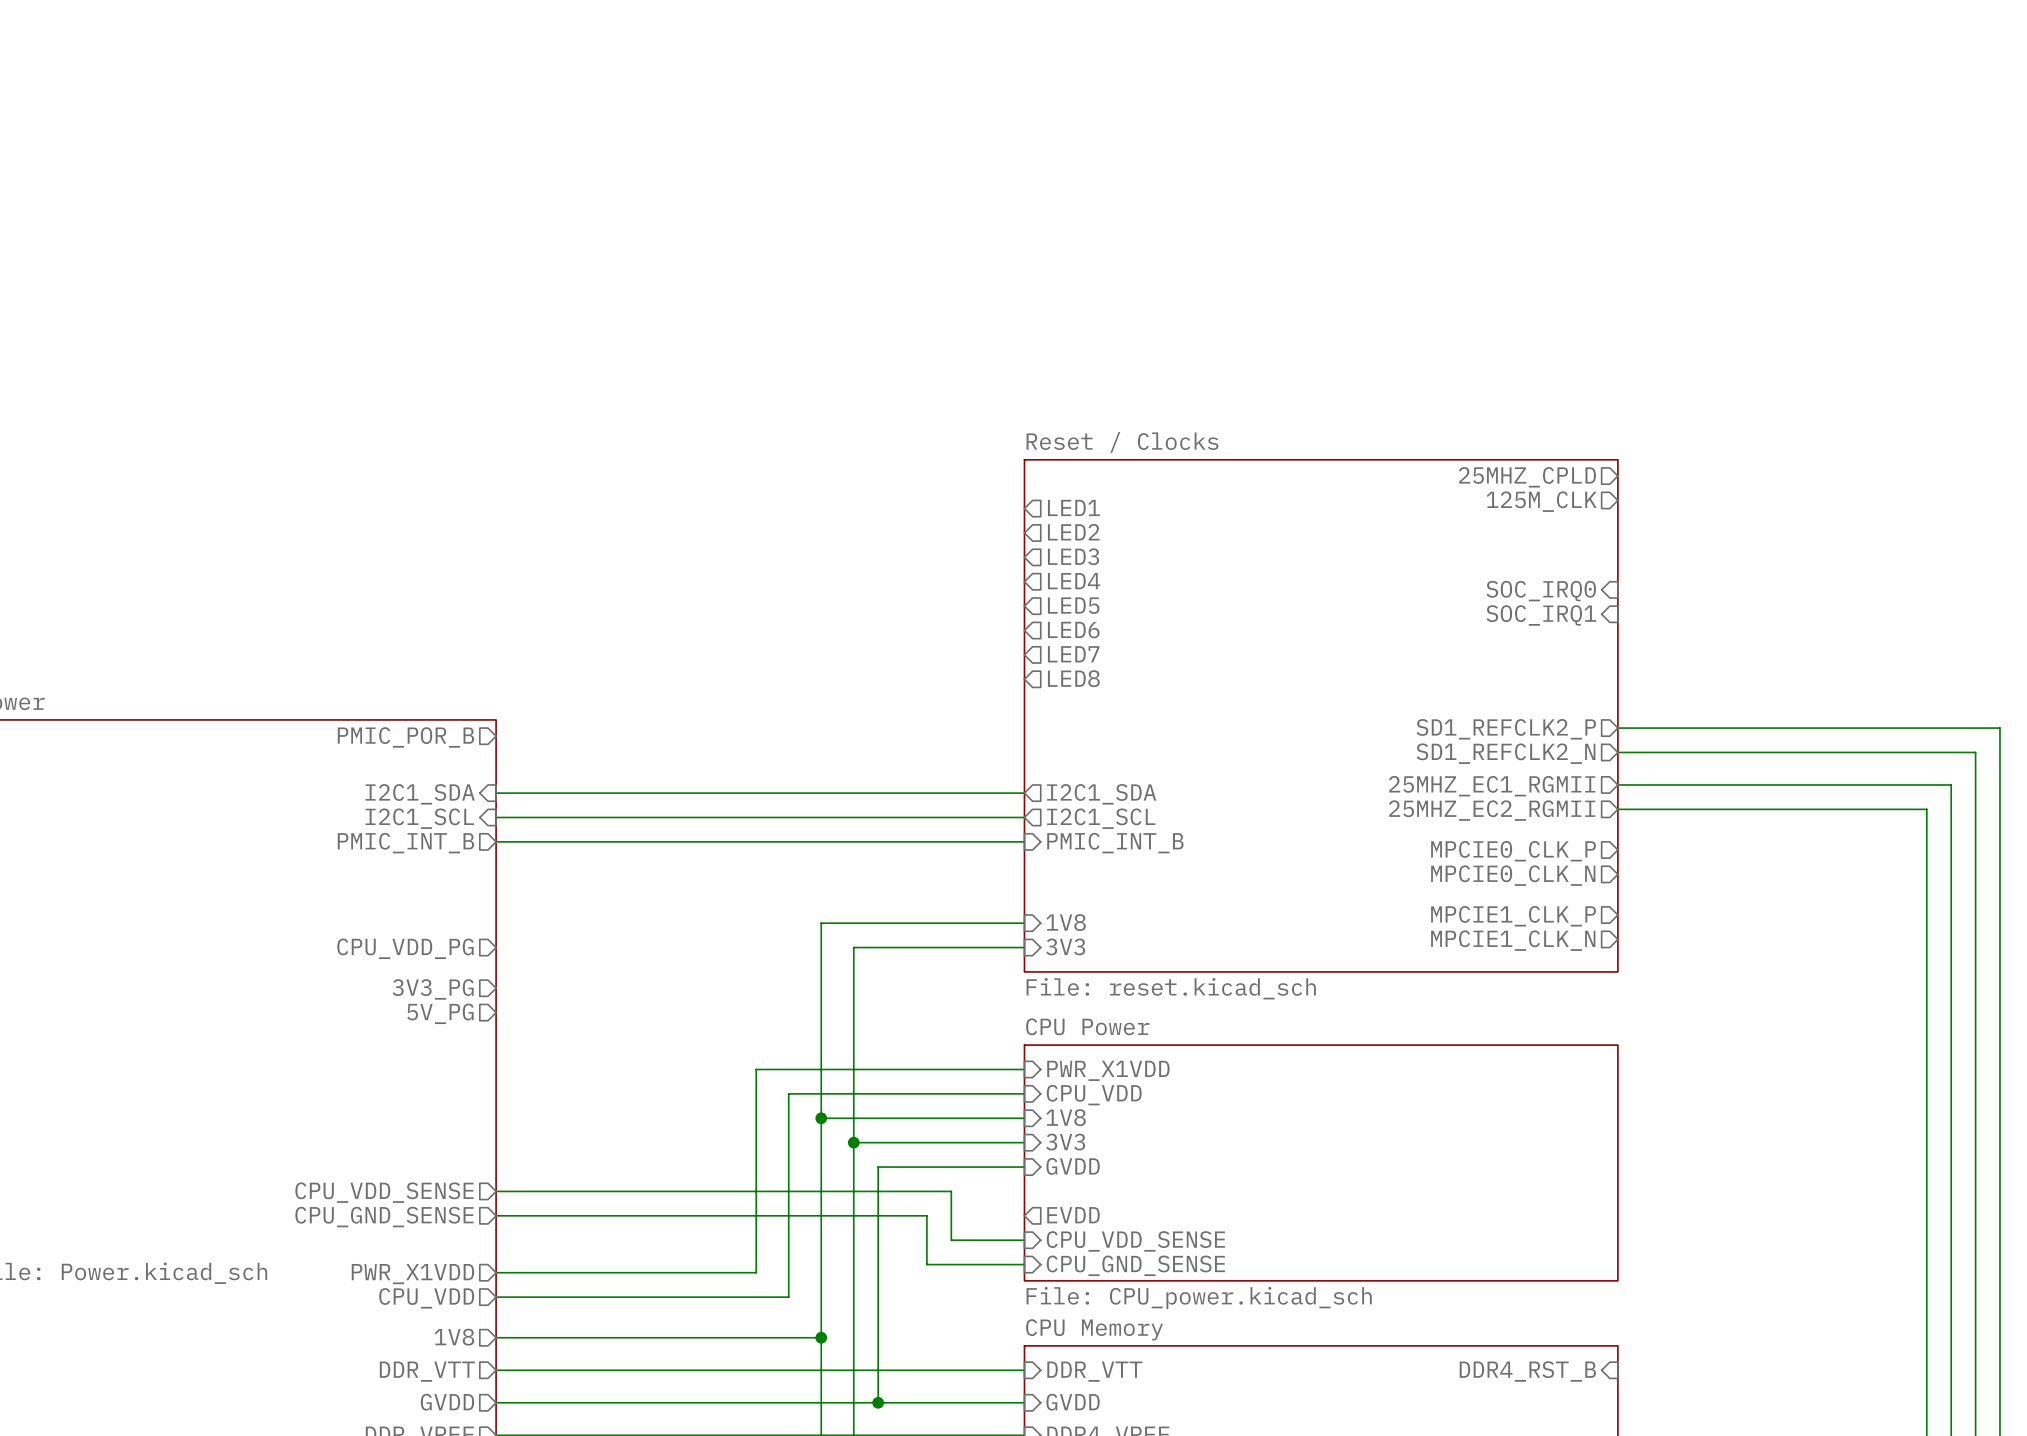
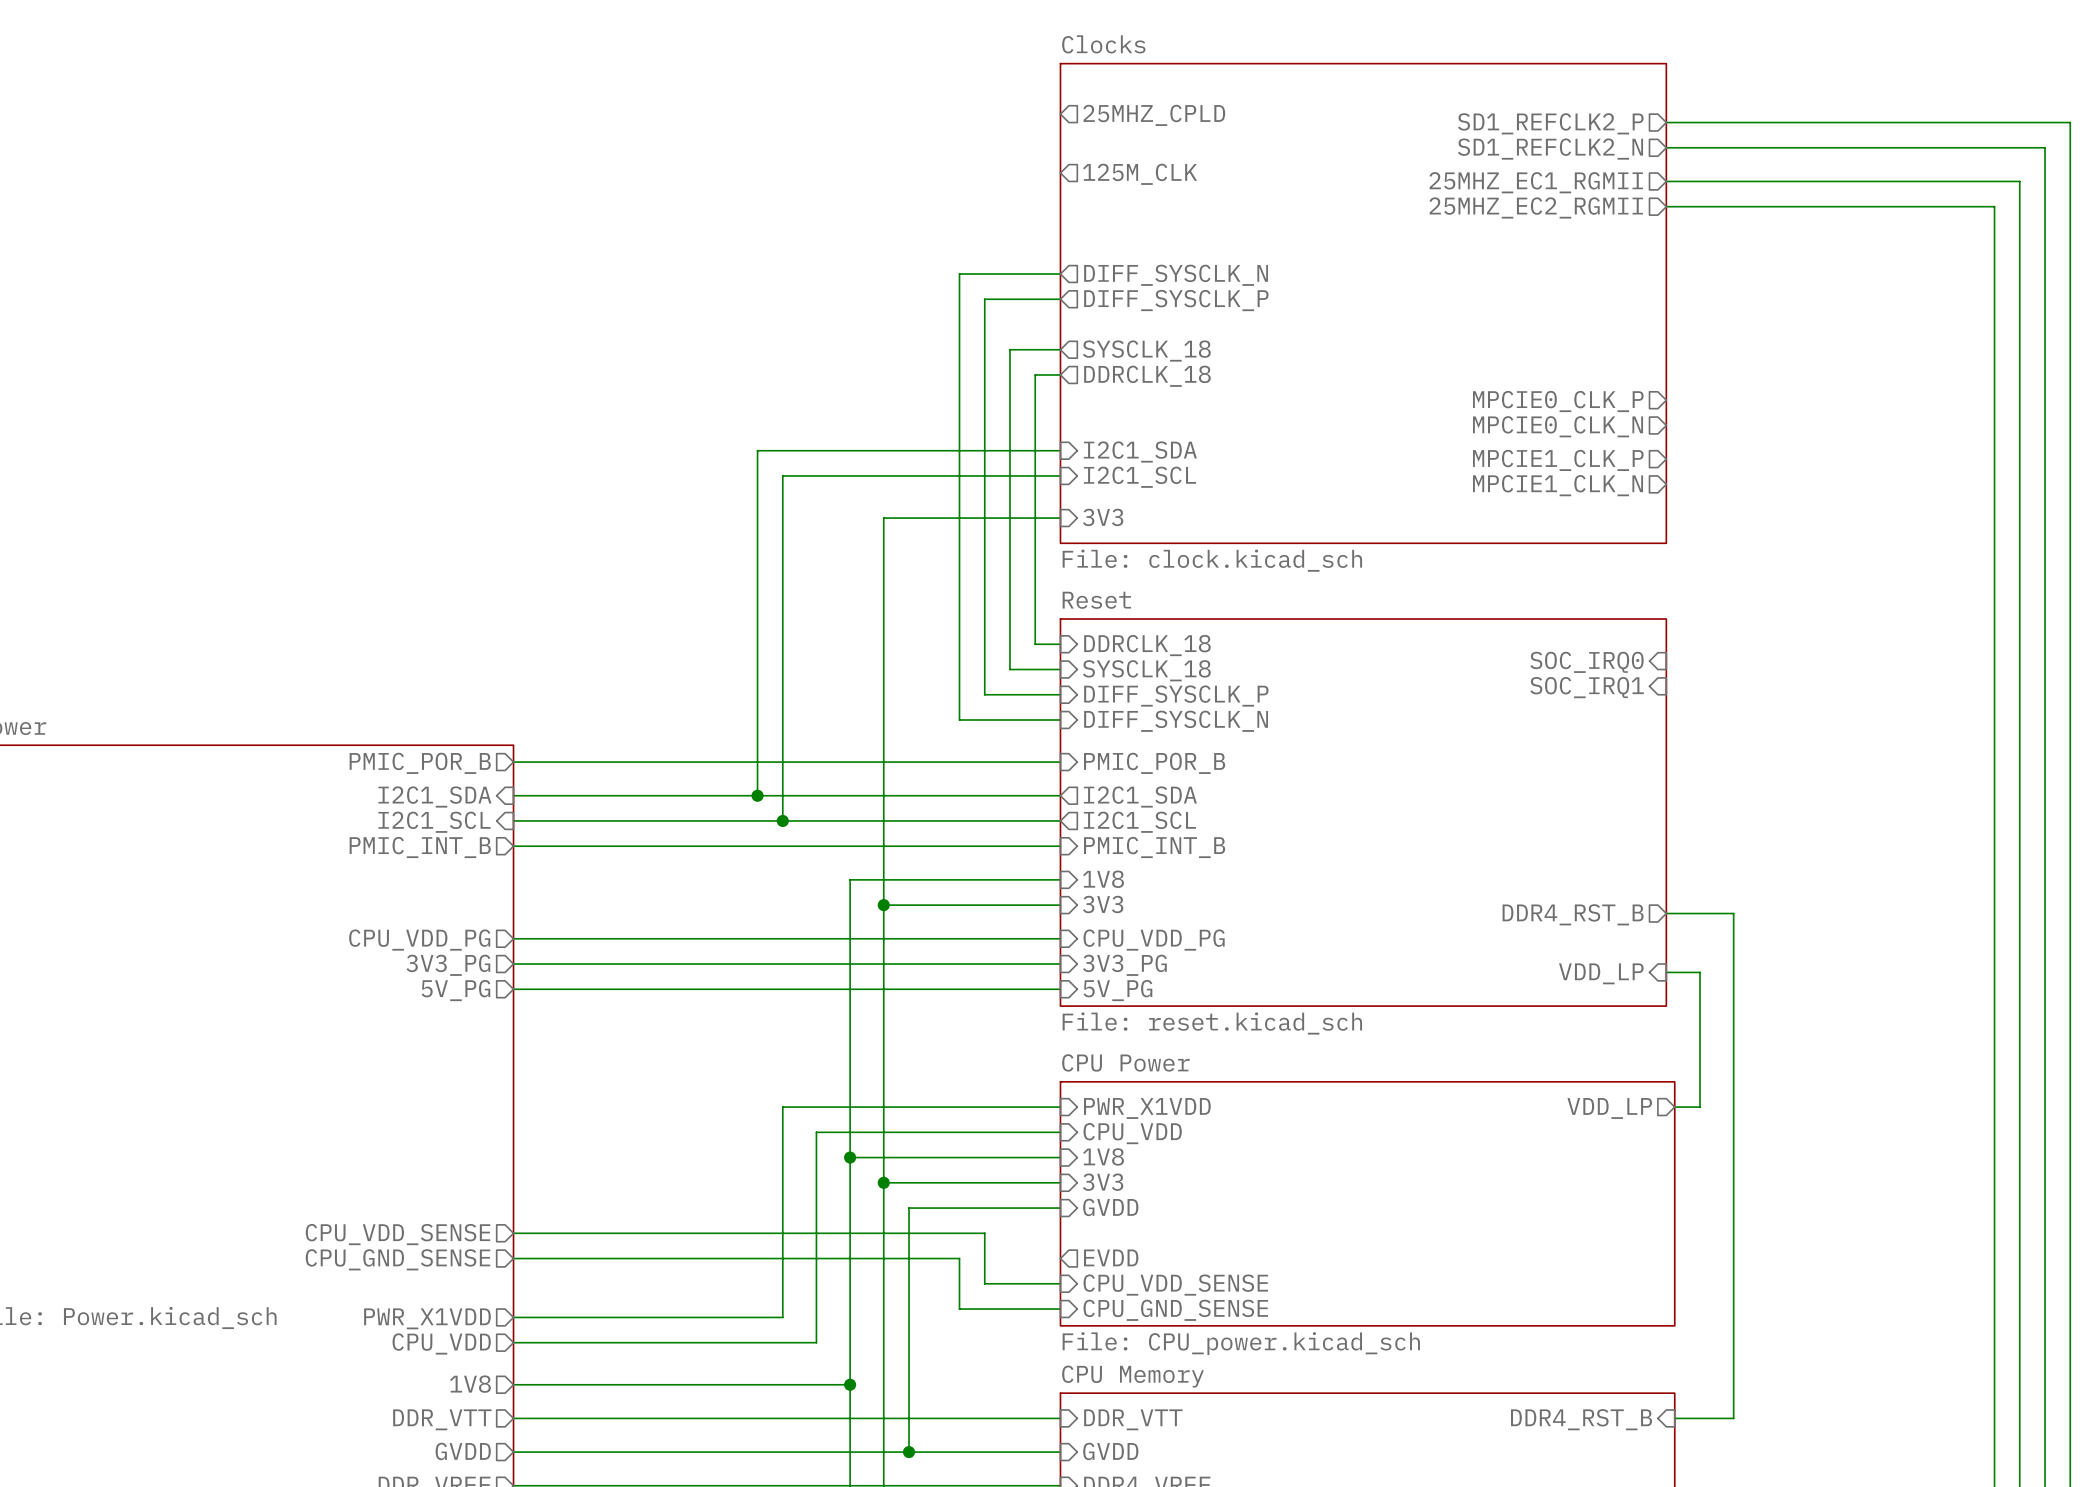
sheet pin: none -> 25MHZ_CPLD (1154, 115)
sheet pin: none -> SD1_REFCLK2_P (1550, 123)
sheet pin: none -> SD1_REFCLK2_N (1550, 149)
sheet pin: none -> 125M_CLK (1140, 174)
sheet pin: none -> 25MHZ_EC1_RGMII (1536, 182)
sheet pin: none -> 25MHZ_EC2_RGMII (1536, 207)
wire: none -> (1060, 274) (959, 274) (959, 719) (1060, 719)
sheet pin: none -> DIFF_SYSCLK_N (1176, 275)
wire: none -> (1060, 299) (984, 299) (984, 694) (1060, 694)
sheet pin: none -> DIFF_SYSCLK_P (1176, 300)
sheet Clocks: none -> File: clock.kicad_sch (1363, 303)
wire: none -> (1060, 349) (1009, 349) (1009, 669) (1060, 669)
sheet pin: none -> SYSCLK_18 (1146, 351)
wire: none -> (1060, 374) (1035, 374) (1035, 644) (1060, 644)
sheet pin: none -> DDRCLK_18 (1147, 376)
sheet pin: none -> MPCIE0_CLK_P (1558, 401)
sheet pin: none -> MPCIE0_CLK_N (1558, 426)
wire: none -> (1060, 450) (757, 450) (757, 795)
sheet pin: none -> I2C1_SDA (1140, 451)
sheet pin: none -> MPCIE1_CLK_P (1558, 460)
wire: none -> (1060, 475) (782, 475) (782, 820)
sheet pin: none -> I2C1_SCL (1139, 477)
sheet pin: 25MHZ_CPLD (1527, 477) -> MPCIE1_CLK_N (1558, 485)
sheet pin: 125M_CLK (1541, 501) -> none
sheet pin shape: output (1073, 507) -> input (1103, 517)
sheet pin: LED1 (1073, 507) -> 3V3 (1103, 517)
sheet pin: LED2 (1073, 532) -> none
sheet pin: LED3 (1073, 556) -> none
sheet pin: LED4 (1074, 581) -> none
sheet pin position: SOC_IRQ0 (1541, 591) -> SOC_IRQ0 (1586, 662)
sheet pin: LED5 (1073, 605) -> none
sheet pin position: SOC_IRQ1 (1541, 615) -> SOC_IRQ1 (1587, 687)
sheet pin: none -> DDRCLK_18 (1147, 645)
sheet pin: LED6 (1073, 630) -> none
sheet pin: none -> SYSCLK_18 (1146, 670)
sheet pin: LED7 (1073, 654) -> none
sheet pin: none -> DIFF_SYSCLK_P (1176, 696)
sheet pin: LED8 (1073, 678) -> none
sheet pin: none -> DIFF_SYSCLK_N (1176, 721)
sheet Reset / Clocks: File: reset.kicad_sch (1321, 715) -> none
wire: (1617, 728) (1999, 728) -> (1666, 122) (2070, 122) (2070, 753)
sheet pin: SD1_REFCLK2_P (1506, 729) -> none
wire: none -> (513, 762) (1060, 762)
sheet pin: none -> PMIC_POR_B (1154, 763)
wire: (1617, 752) (1975, 752) -> (1666, 147) (2045, 147) (2045, 778)
sheet pin: SD1_REFCLK2_N (1506, 753) -> none
junction: none -> (757, 795)
sheet pin: none -> I2C1_SDA (434, 796)
sheet pin: none -> I2C1_SDA (1140, 796)
sheet Reset: none -> File: reset.kicad_sch (1363, 812)
wire: (1617, 784) (1951, 784) -> (1666, 181) (2019, 181) (2019, 812)
sheet pin: 25MHZ_EC1_RGMII (1492, 786) -> none
junction: none -> (782, 820)
sheet pin: I2C1_SDA (420, 794) -> I2C1_SCL (434, 822)
sheet pin: I2C1_SDA (1101, 794) -> I2C1_SCL (1139, 822)
wire: (1617, 809) (1926, 809) -> (1666, 206) (1994, 206) (1994, 837)
sheet pin: 25MHZ_EC2_RGMII (1492, 810) -> none
sheet pin shape: input (419, 818) -> output (420, 847)
sheet pin: I2C1_SCL (419, 818) -> PMIC_INT_B (420, 847)
sheet pin shape: output (1101, 818) -> input (1154, 847)
sheet pin: I2C1_SCL (1101, 818) -> PMIC_INT_B (1154, 847)
wire: (496, 841) (1024, 841) -> (513, 795) (1060, 795)
sheet pin: PMIC_INT_B (405, 843) -> none
sheet pin: PMIC_INT_B (1115, 843) -> none
sheet pin: MPCIE0_CLK_P (1513, 851) -> none
wire: none -> (883, 905) (1060, 905)
junction: none -> (883, 905)
sheet pin: MPCIE0_CLK_N (1513, 875) -> DDR4_RST_B (1573, 914)
wire: none -> (1666, 913) (1733, 913) (1733, 1418) (1674, 1418)
wire: none -> (513, 938) (1060, 938)
sheet pin: none -> CPU_VDD_PG (1154, 940)
sheet pin: MPCIE1_CLK_P (1513, 916) -> none
sheet pin position: 1V8 (1066, 922) -> 1V8 (1103, 879)
wire: (821, 923) (1024, 923) -> (850, 955) (850, 879) (1060, 879)
wire: none -> (513, 964) (1060, 964)
sheet pin: none -> 3V3_PG (1124, 965)
wire: none -> (1666, 972) (1700, 972) (1700, 1107) (1674, 1107)
sheet pin shape: output (1513, 940) -> input (1601, 973)
sheet pin: MPCIE1_CLK_N (1513, 940) -> VDD_LP (1601, 973)
sheet pin position: 3V3 (1065, 946) -> 3V3 (1103, 904)
wire: (853, 947) (1024, 947) -> (883, 980) (883, 518) (1060, 518)
sheet pin position: CPU_VDD_PG (405, 948) -> CPU_VDD_PG (419, 940)
wire: none -> (513, 989) (1060, 989)
sheet pin: none -> 5V_PG (1117, 990)
sheet pin position: 3V3_PG (433, 989) -> 3V3_PG (448, 965)
sheet pin position: 5V_PG (440, 1013) -> 5V_PG (455, 990)
sheet pin: none -> VDD_LP (1609, 1108)

